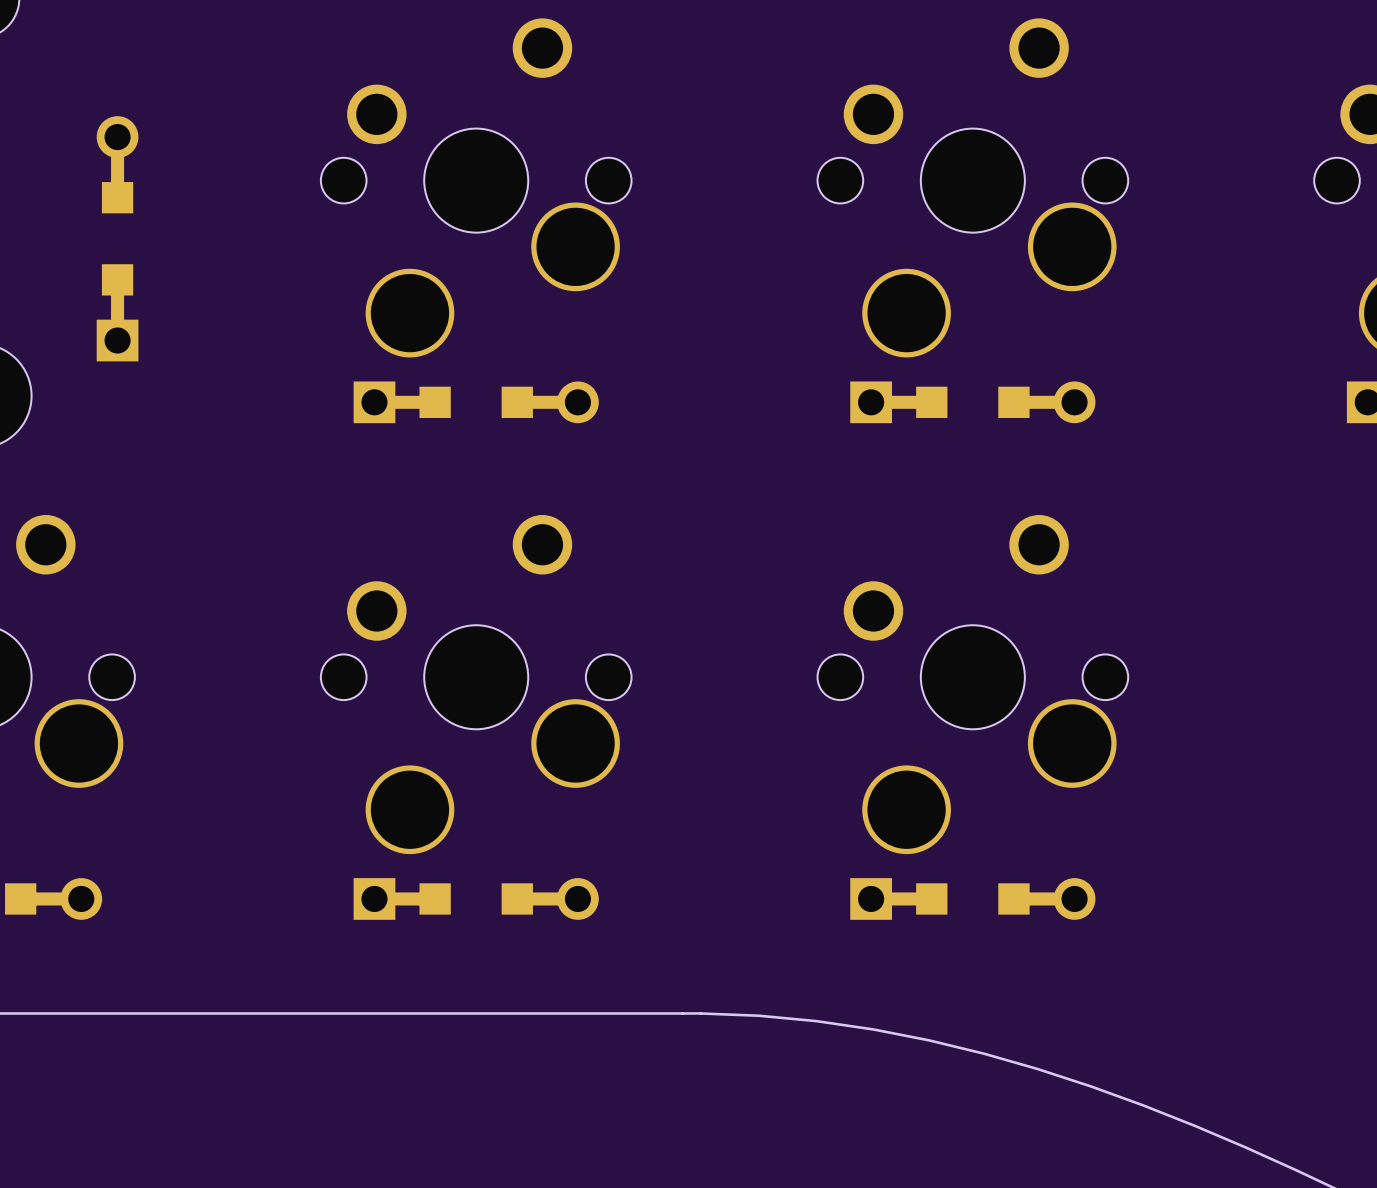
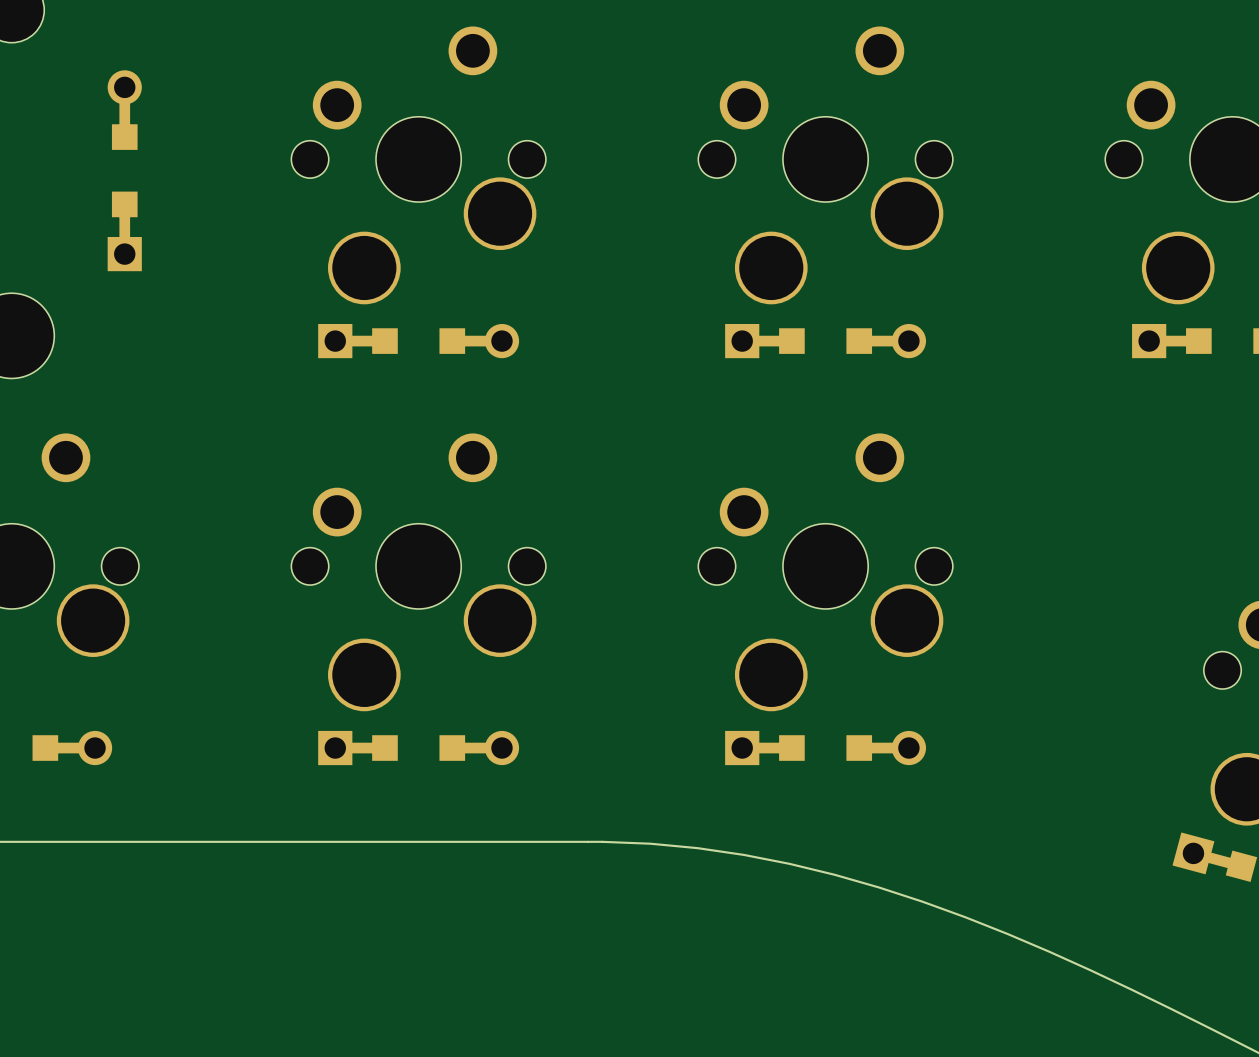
part position: (117, 238) -> (124, 170)

